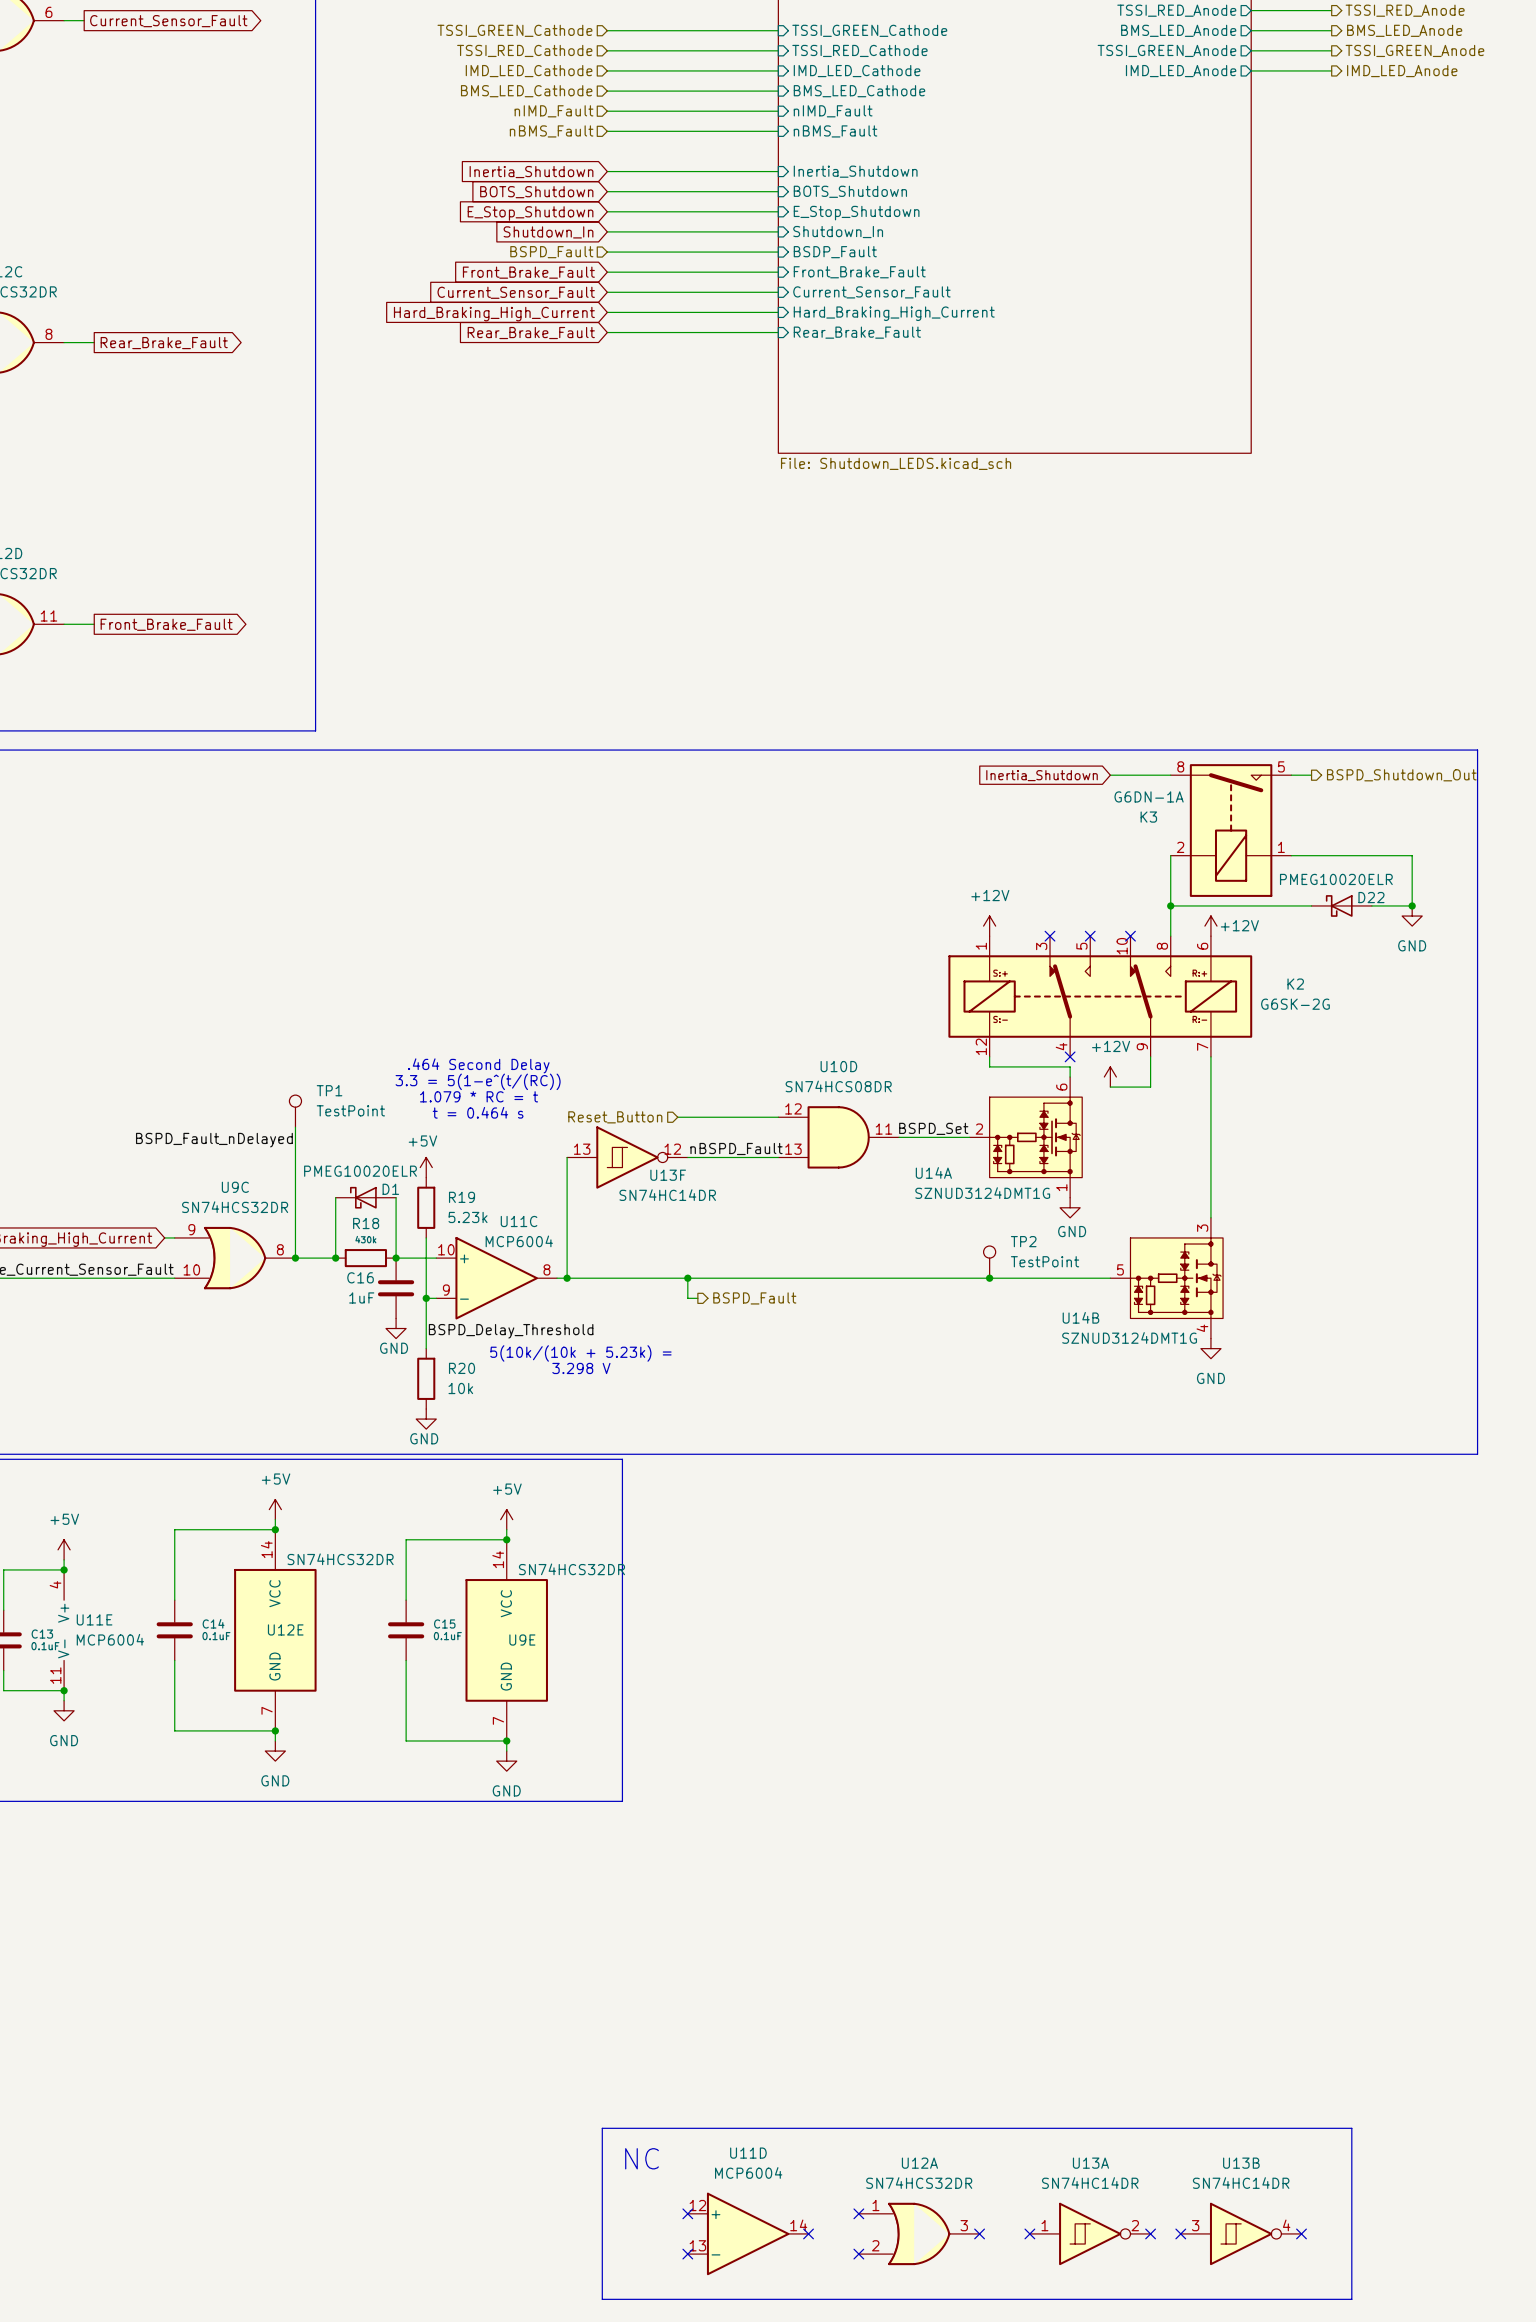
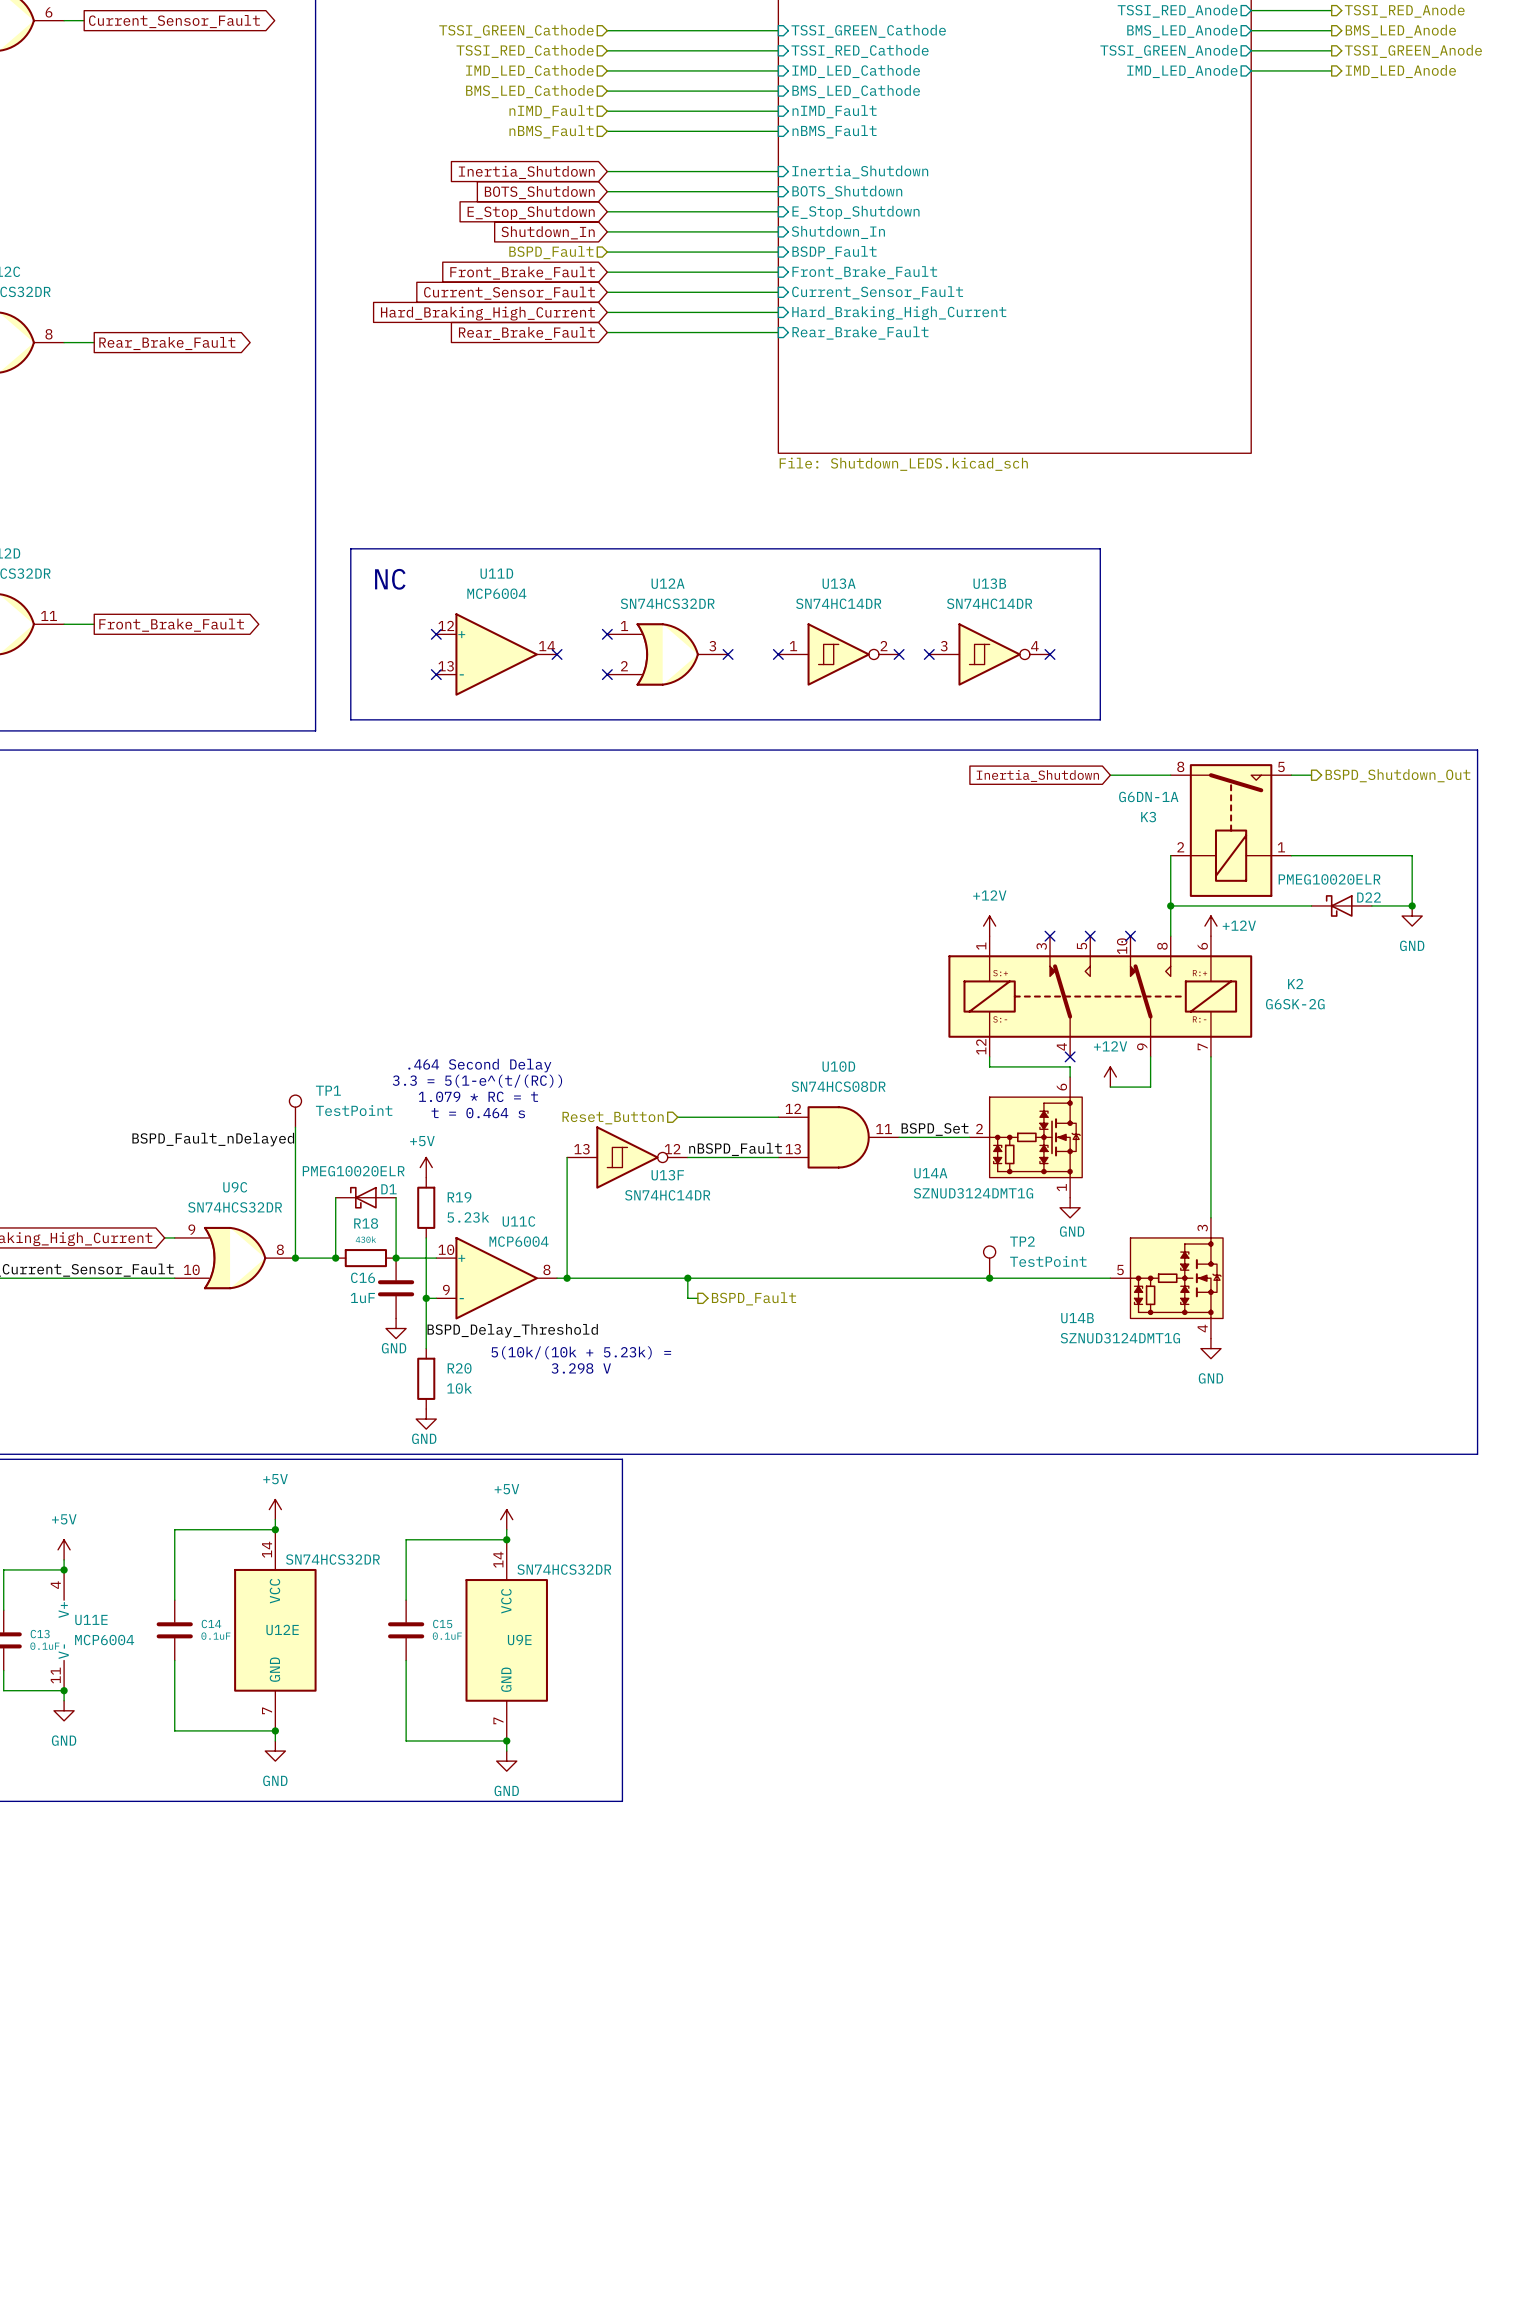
line: none -> (350, 548) (1100, 548) (1100, 719) (350, 719) (350, 548)
text: none -> NC (390, 579)
no-connect mark: none -> (436, 634)
no-connect mark: none -> (607, 634)
no-connect mark: none -> (557, 654)
no-connect mark: none -> (728, 654)
no-connect mark: none -> (778, 654)
no-connect mark: none -> (899, 654)
no-connect mark: none -> (929, 654)
no-connect mark: none -> (1049, 654)
no-connect mark: none -> (436, 674)
no-connect mark: none -> (607, 674)
line: (602, 2128) (1351, 2128) (1351, 2299) (602, 2299) (602, 2128) -> none
text: NC (642, 2158) -> none
no-connect mark: (687, 2213) -> none
no-connect mark: (858, 2213) -> none
U11D position: (748, 2233) -> (496, 654)
no-connect mark: (808, 2233) -> none
U12A position: (919, 2233) -> (667, 654)
no-connect mark: (979, 2233) -> none
no-connect mark: (1029, 2233) -> none
U13A position: (1090, 2233) -> (838, 654)
no-connect mark: (1150, 2233) -> none
no-connect mark: (1180, 2233) -> none
U13B position: (1241, 2233) -> (989, 654)
no-connect mark: (1301, 2233) -> none
no-connect mark: (687, 2254) -> none
no-connect mark: (858, 2254) -> none

